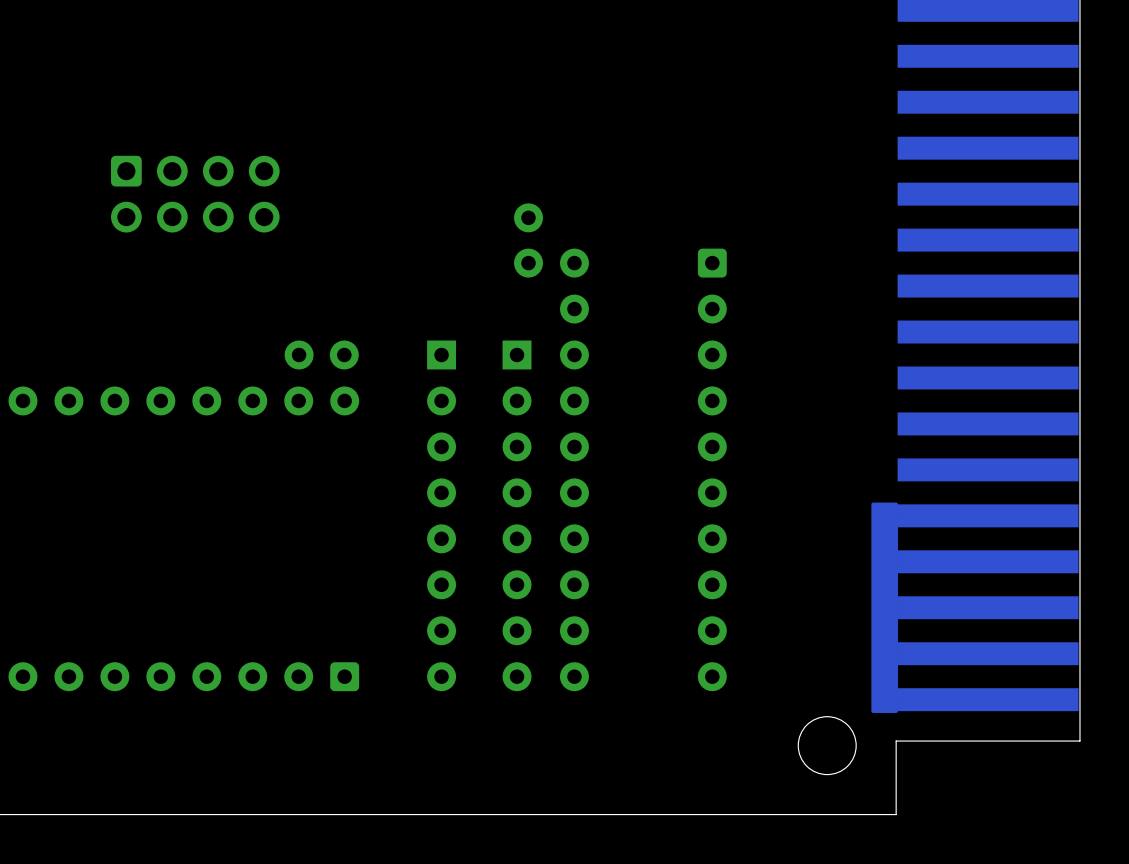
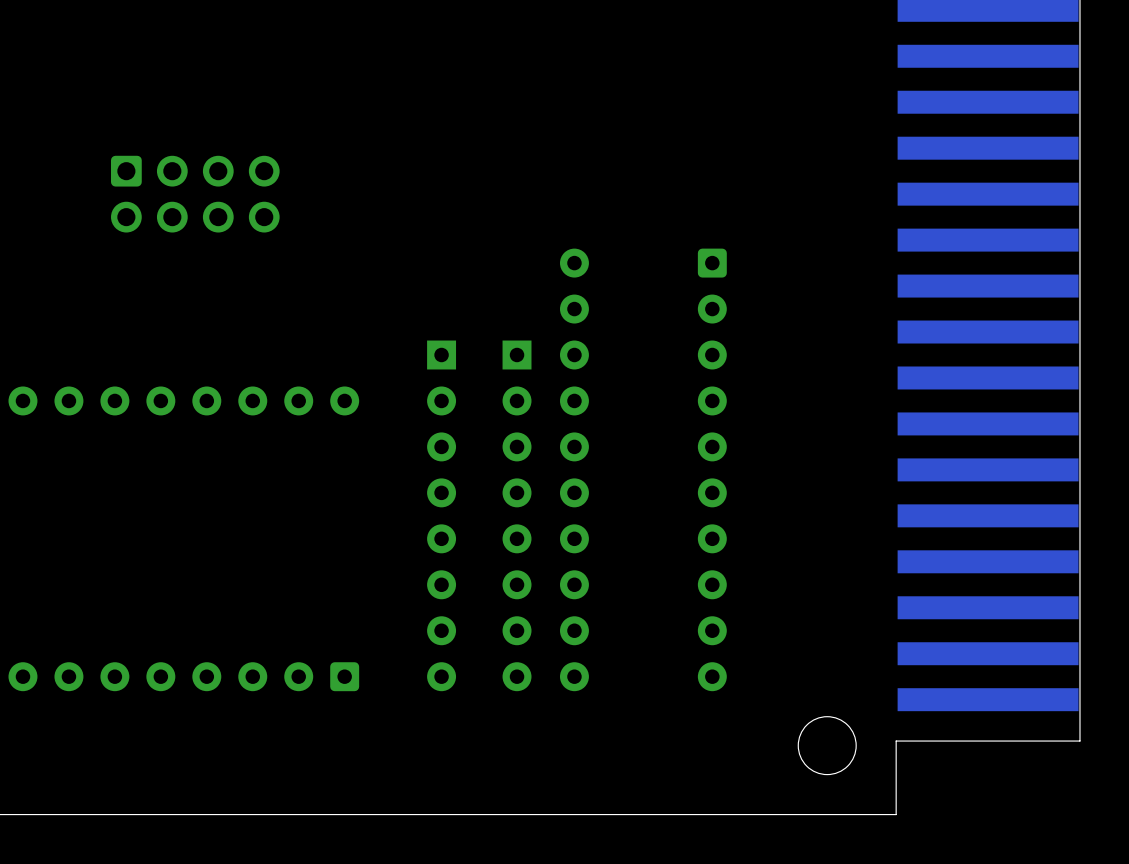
part: (528, 240) -> none
part: (321, 355) -> none
drawing: [871, 502, 898, 713] -> none

